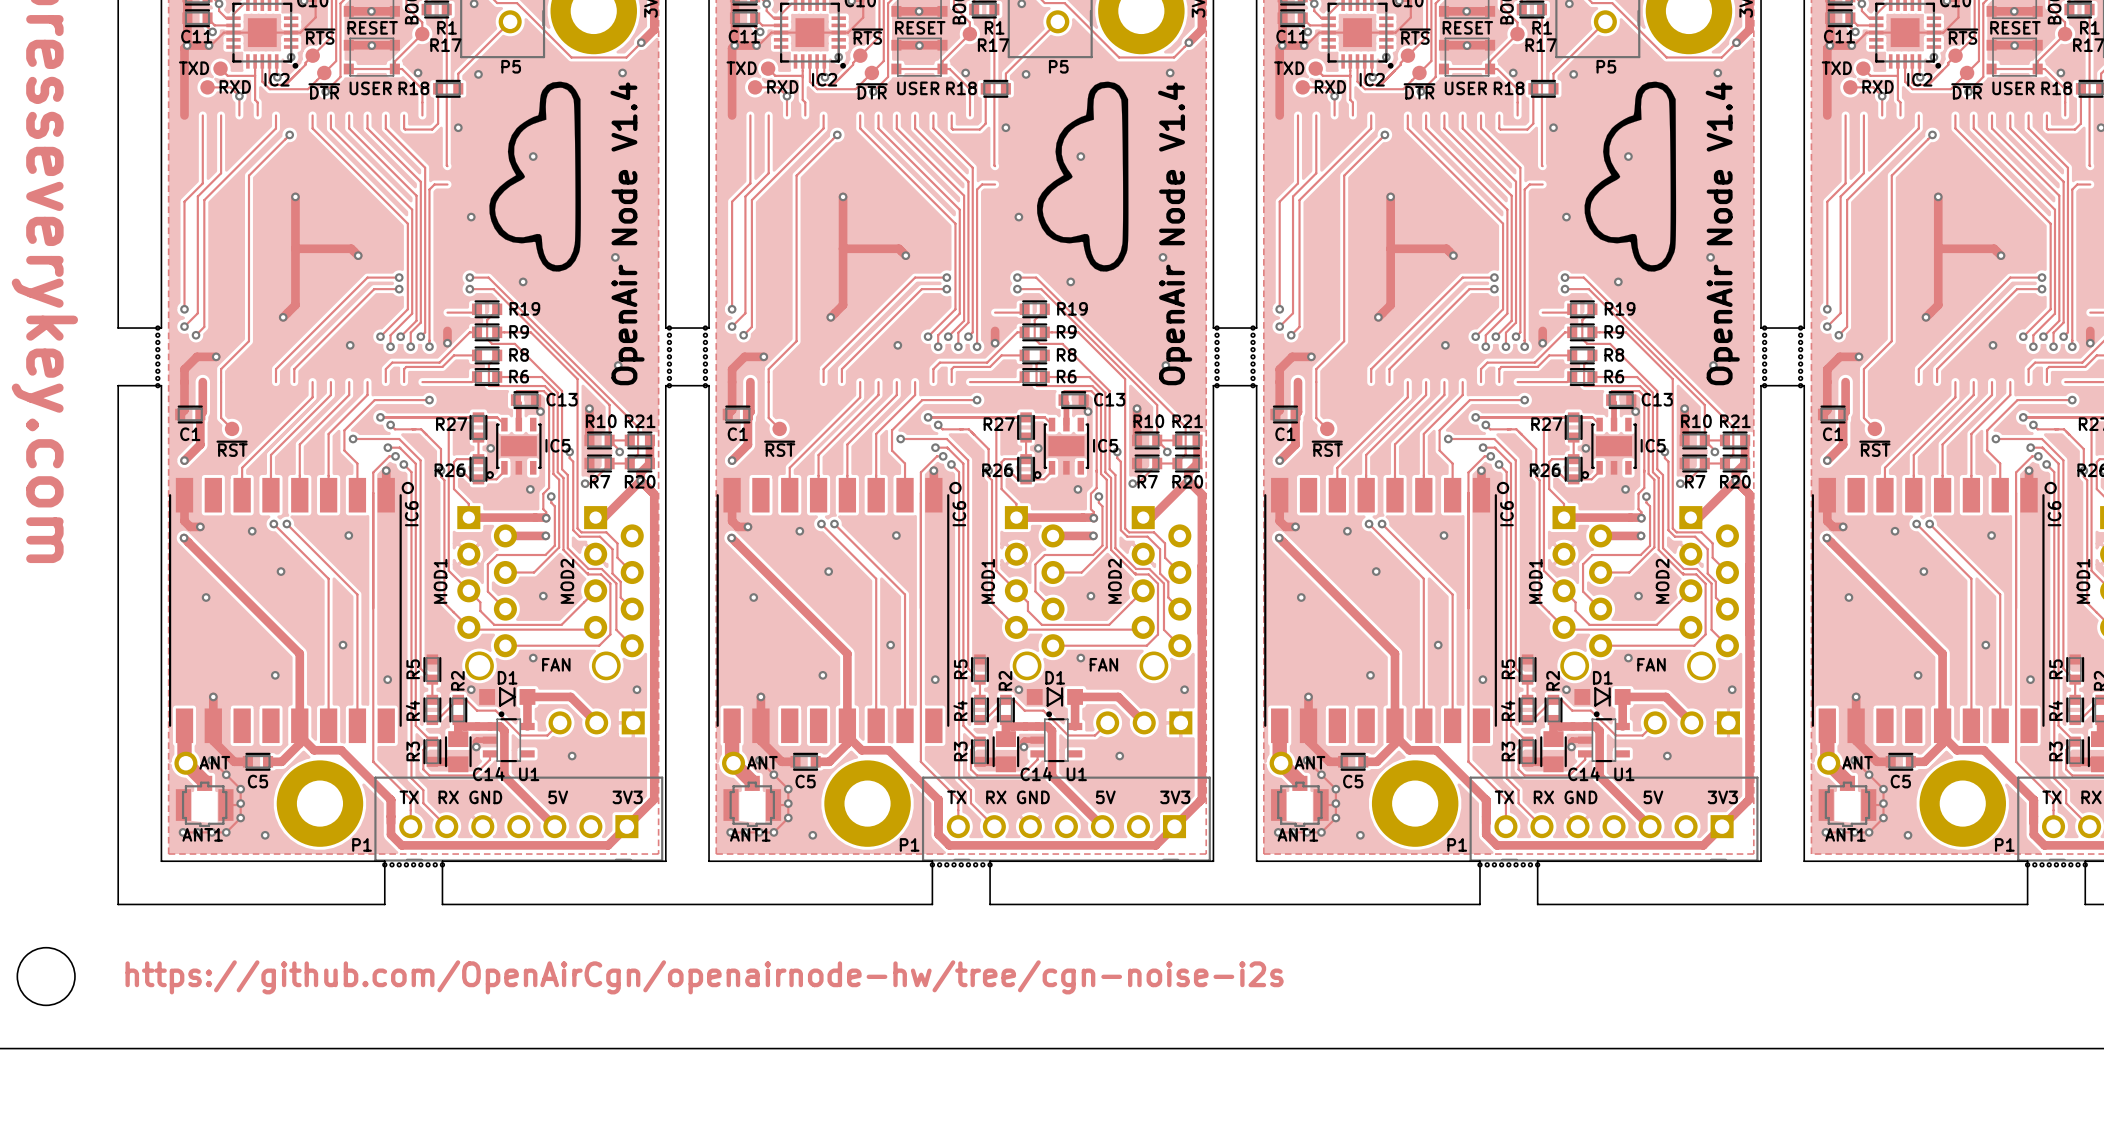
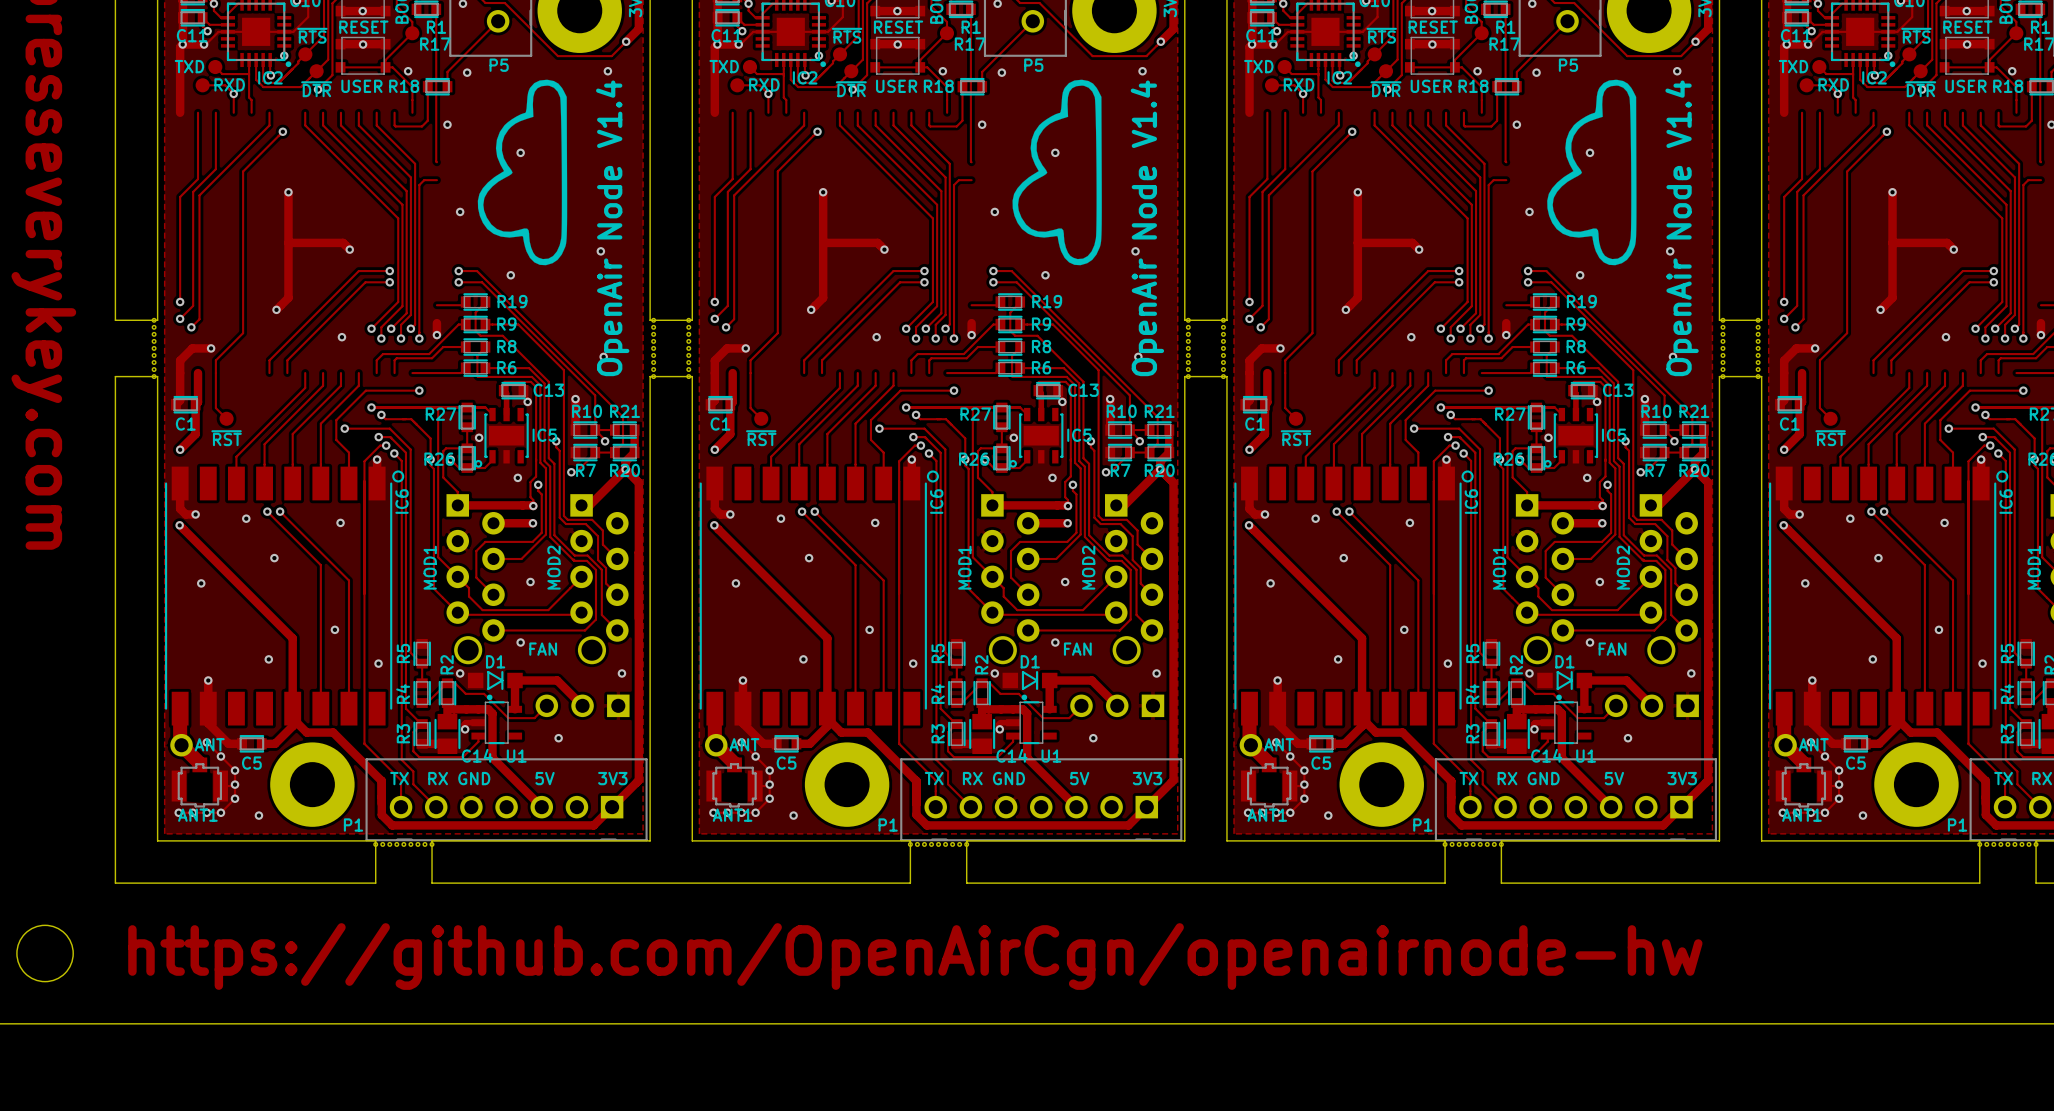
text: https://github.com/OpenAirCgn/openairnode-hw/tree/cgn-noise-i2s (704, 977) -> https://github.com/OpenAirCgn/openairnode-hw (915, 956)

